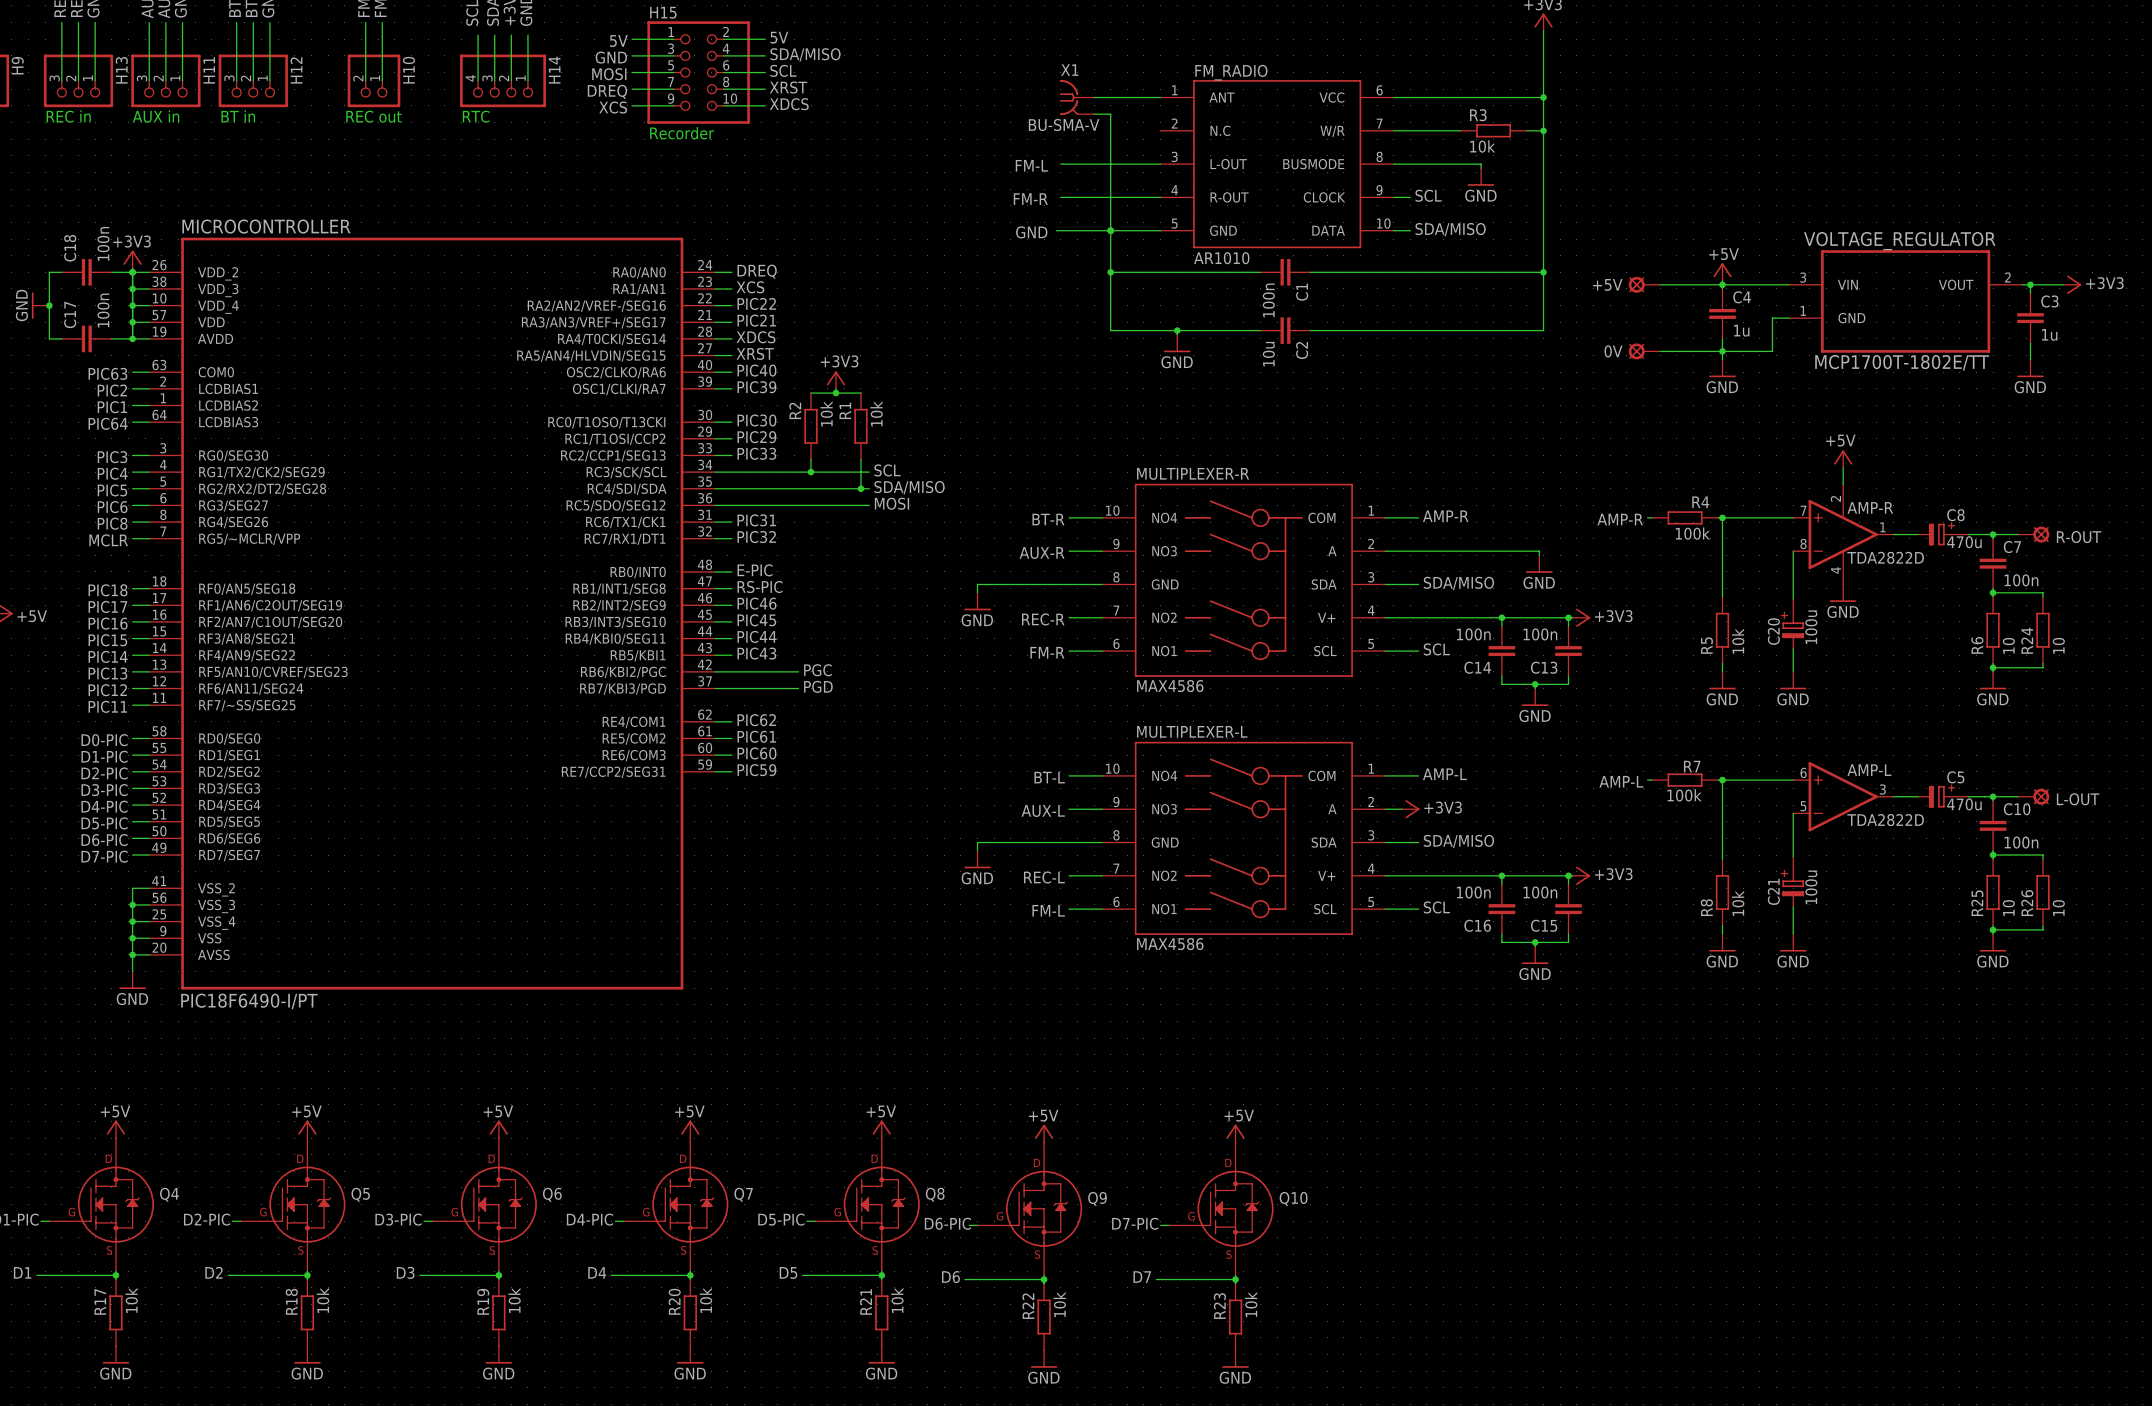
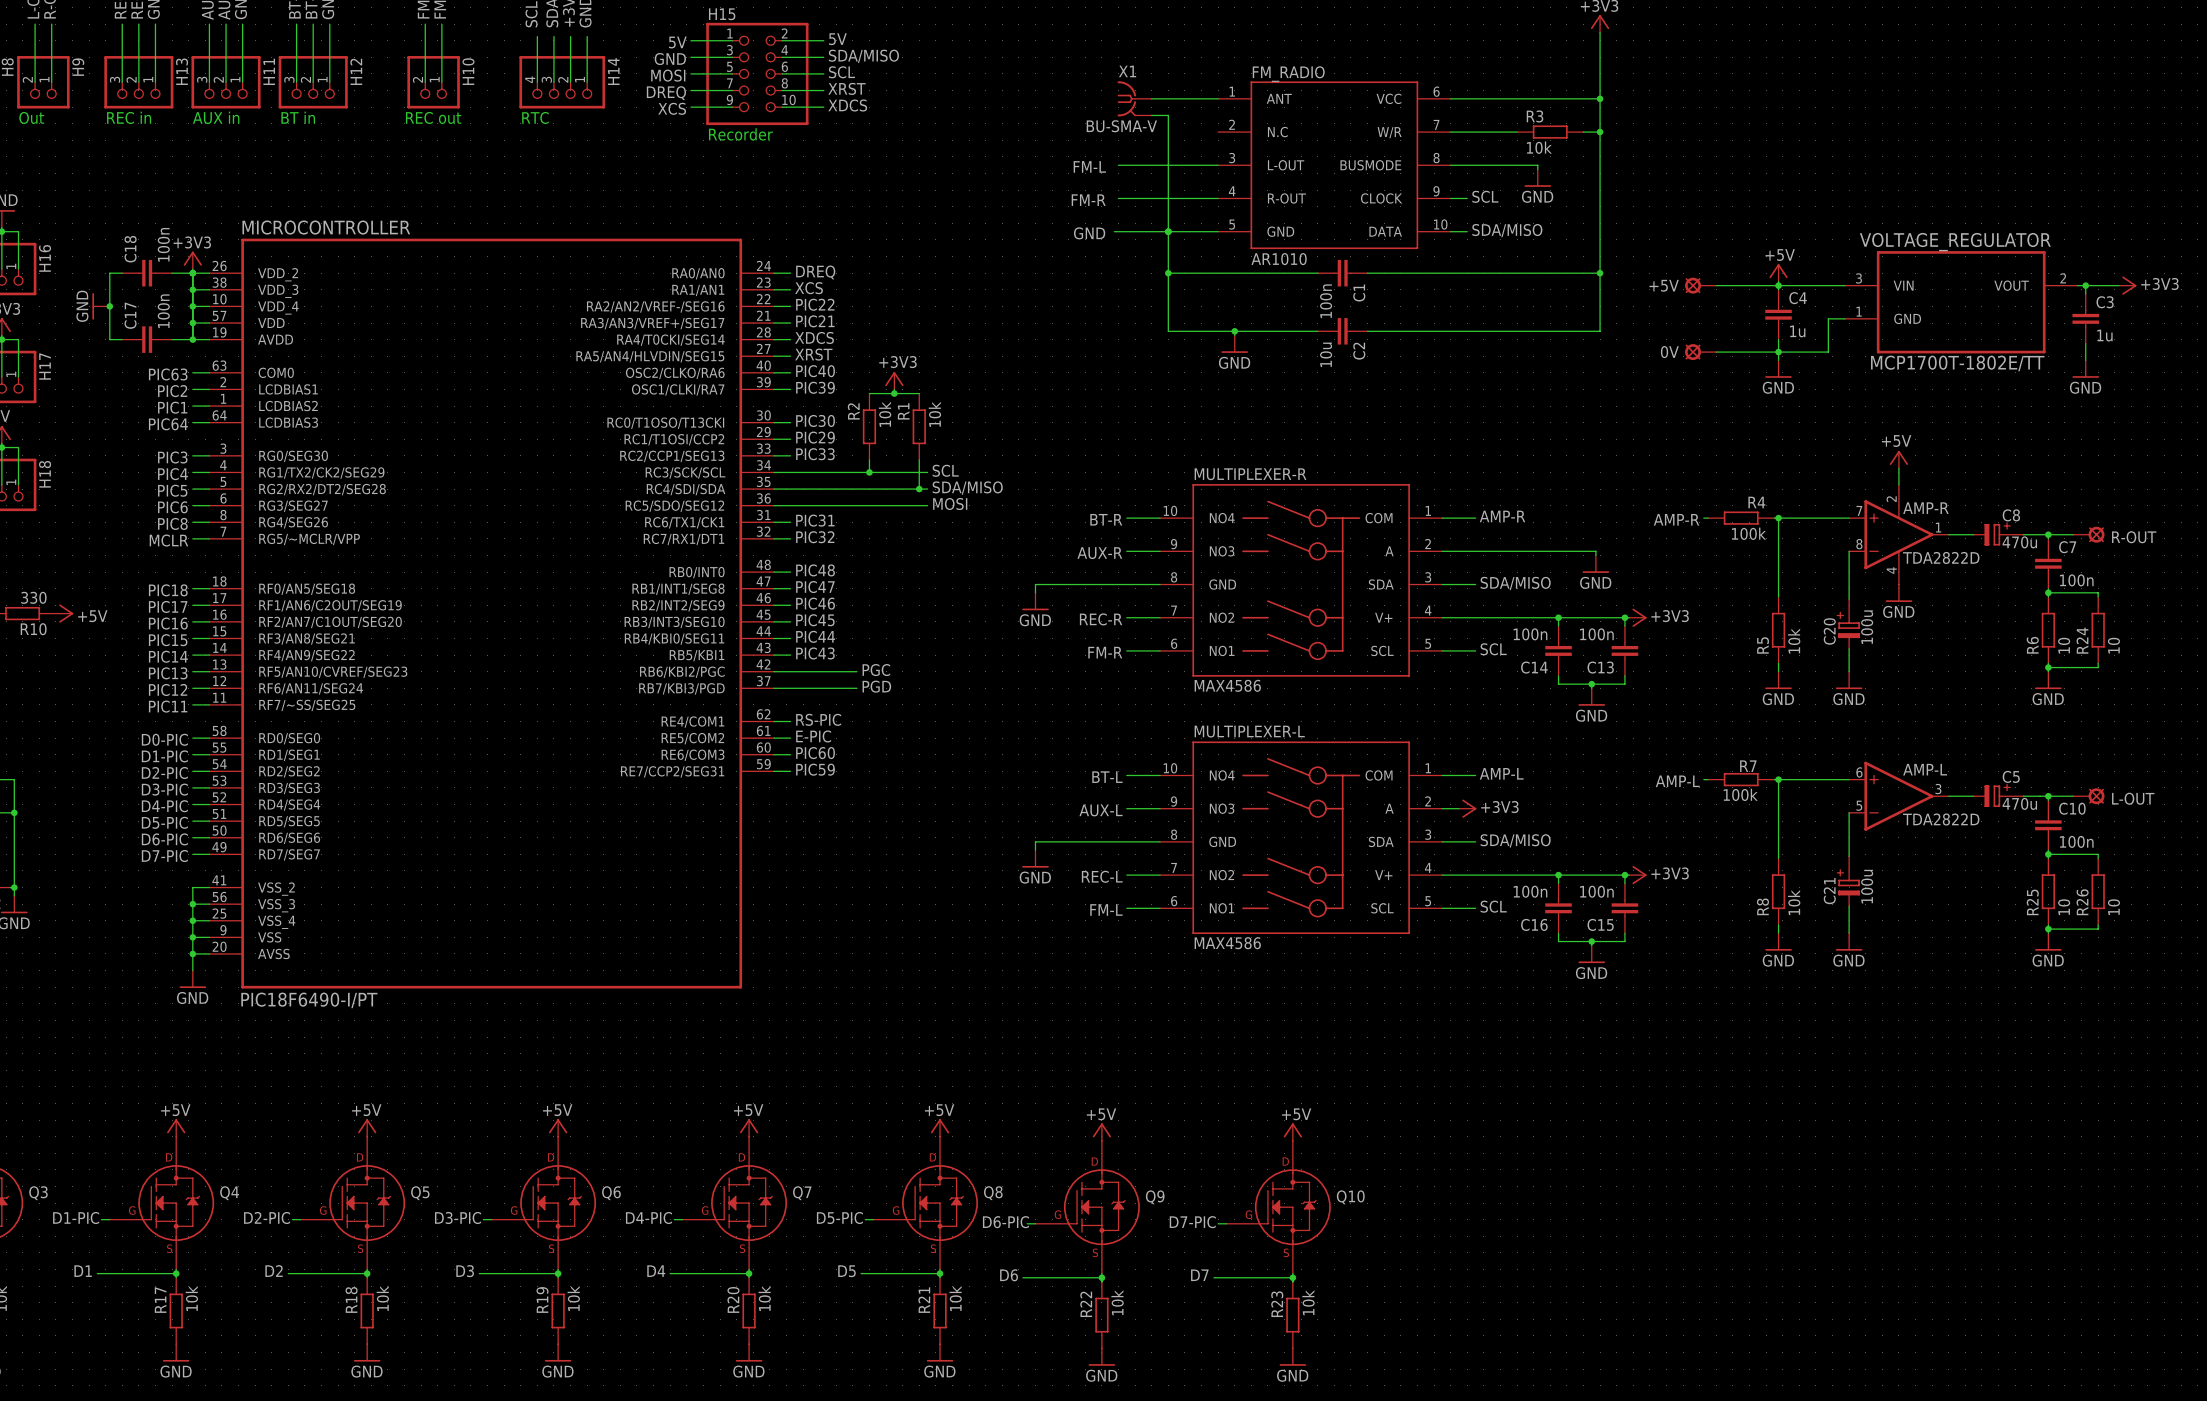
label: E-PIC (755, 570) -> PIC48 (815, 570)
label: RS-PIC (760, 586) -> PIC47 (815, 587)
label: PIC62 (756, 720) -> RS-PIC (818, 719)
label: PIC61 (756, 736) -> E-PIC (813, 736)

